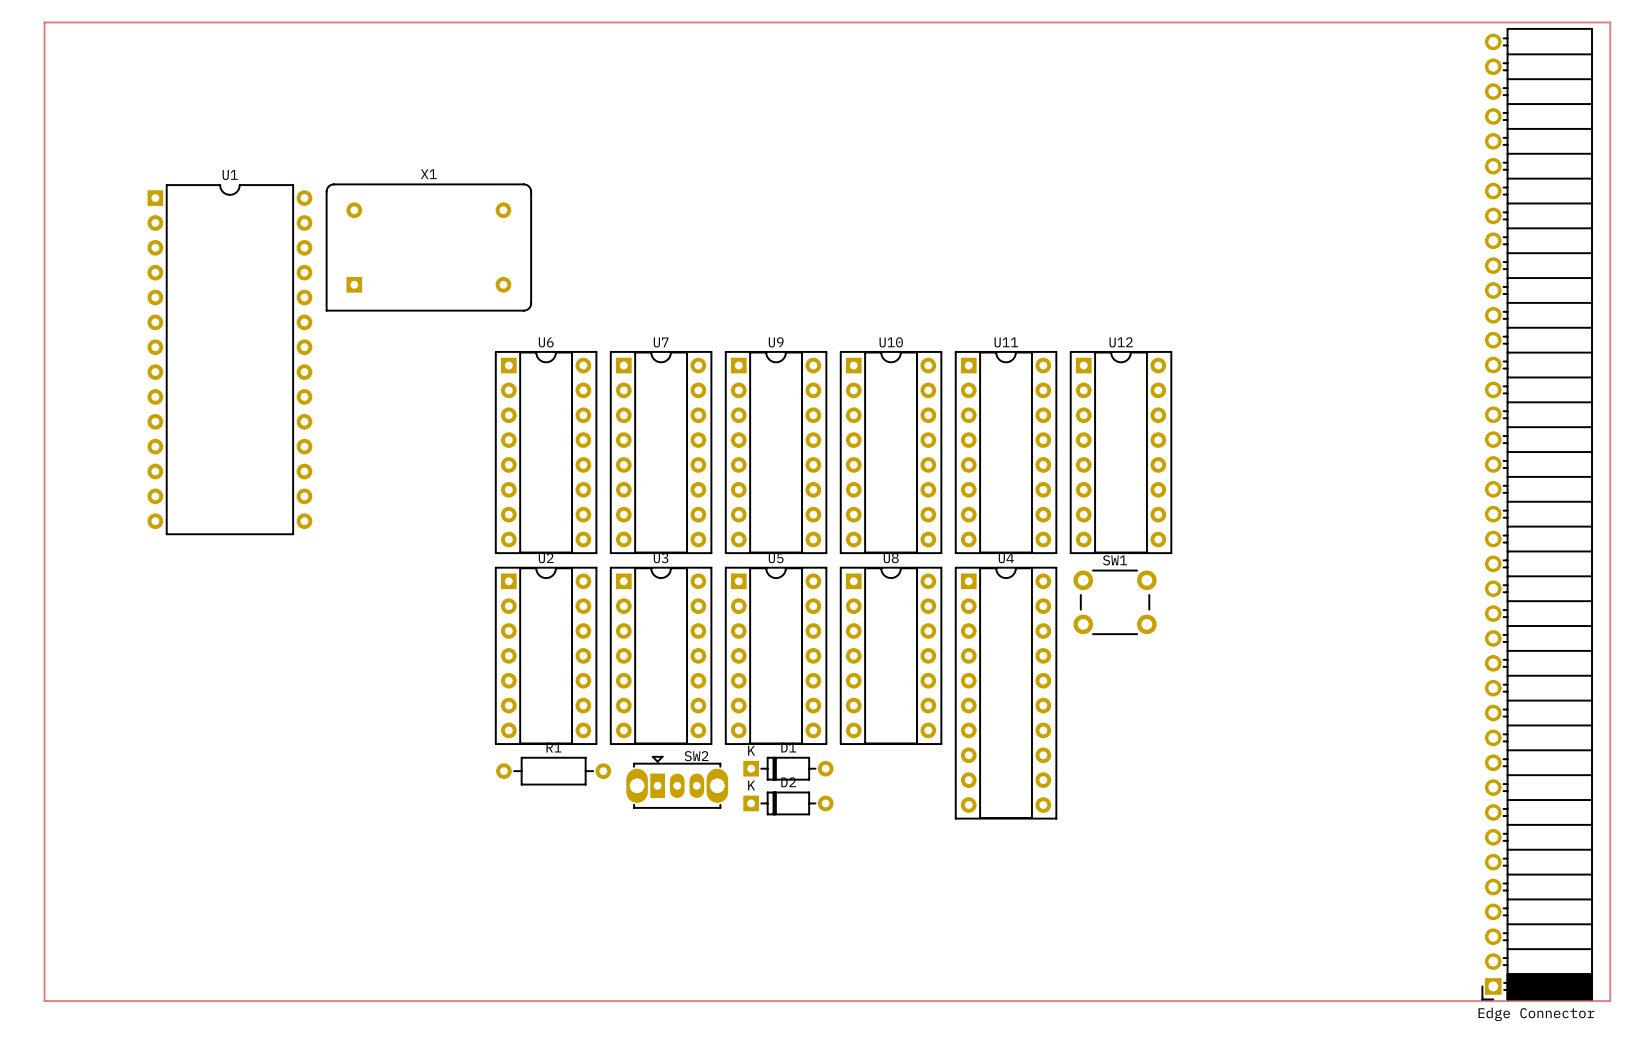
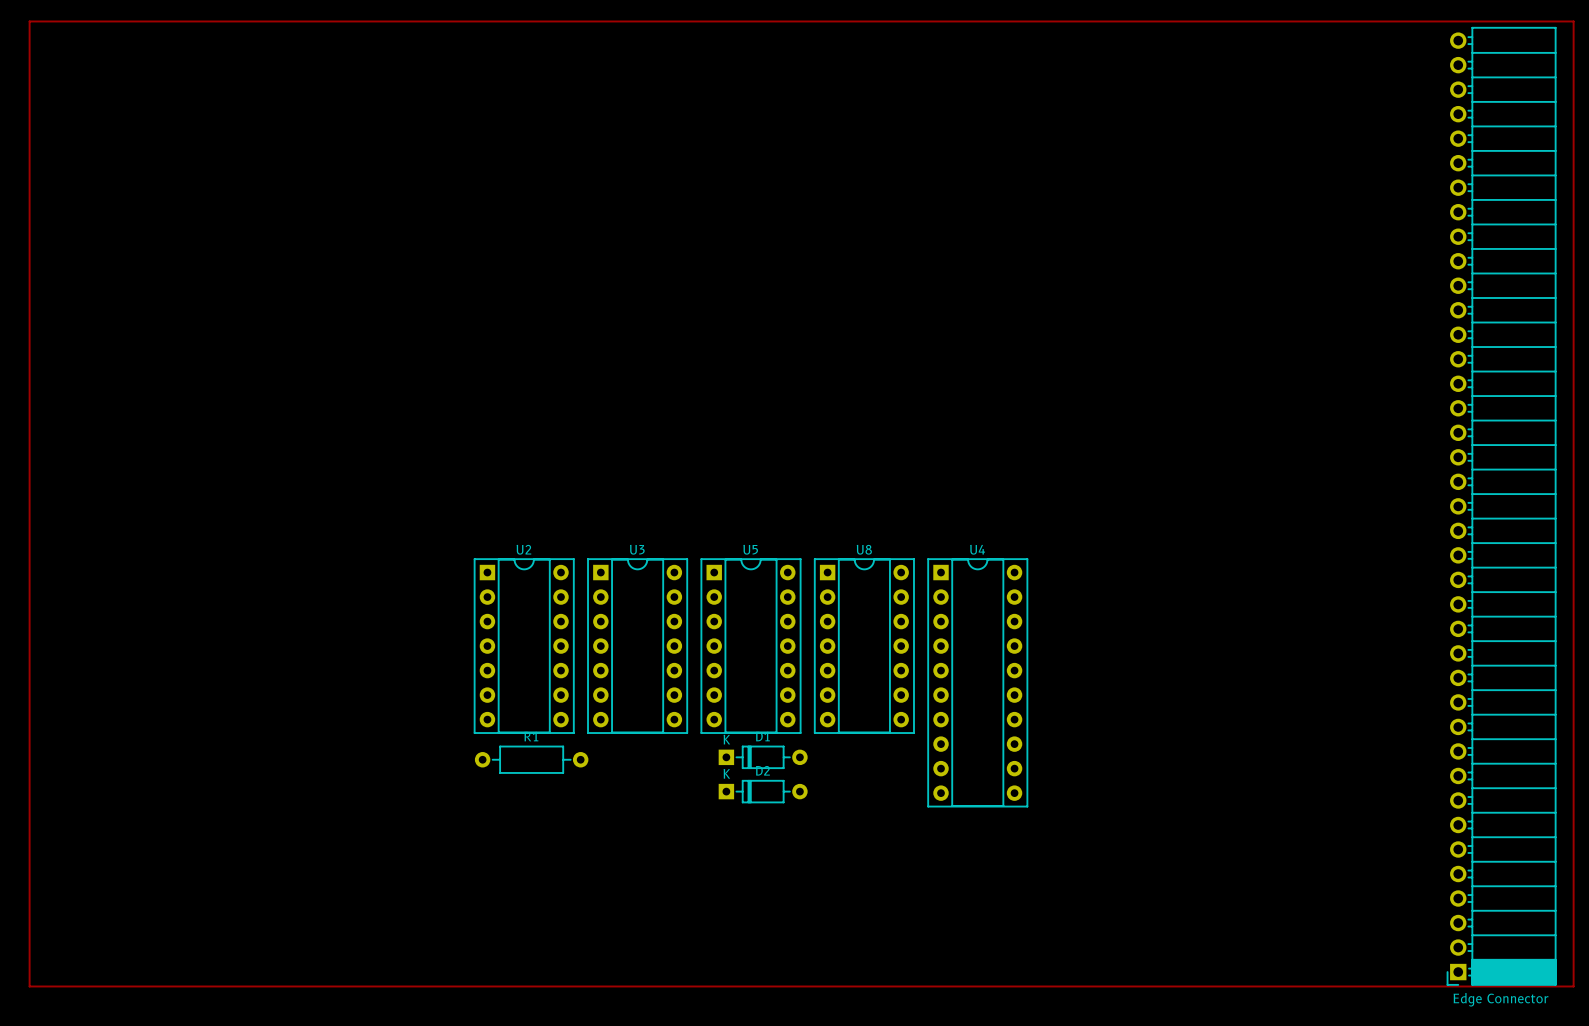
X1: (428, 247) -> none
U1: (229, 359) -> none
U6: (546, 452) -> none
U7: (661, 452) -> none
U9: (776, 452) -> none
U10: (891, 452) -> none
U11: (1006, 452) -> none
U12: (1121, 452) -> none
SW1: (1115, 602) -> none
SW2: (677, 782) -> none

